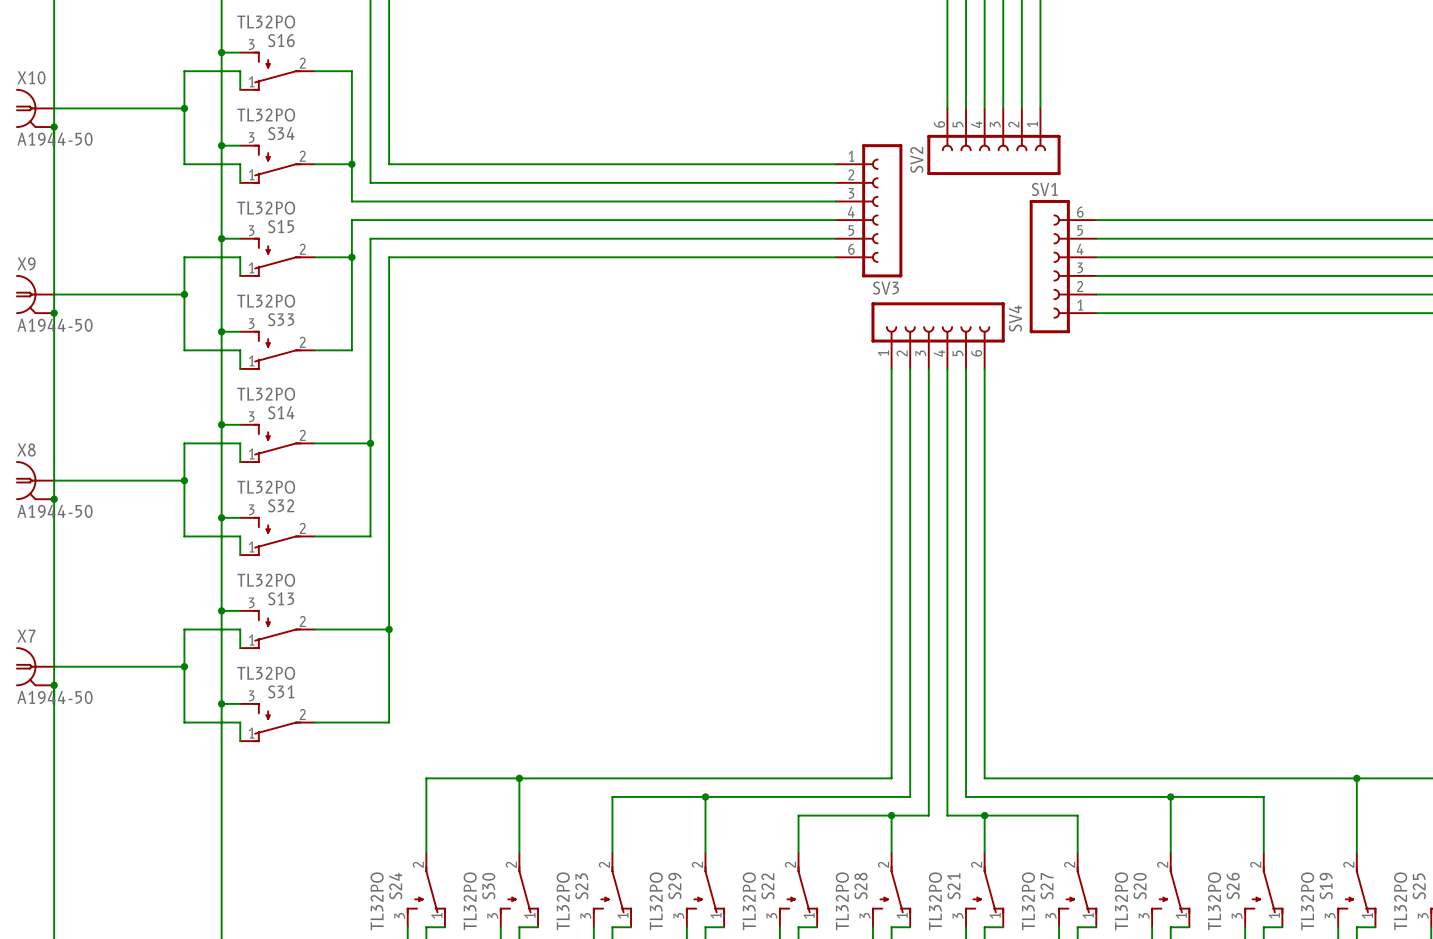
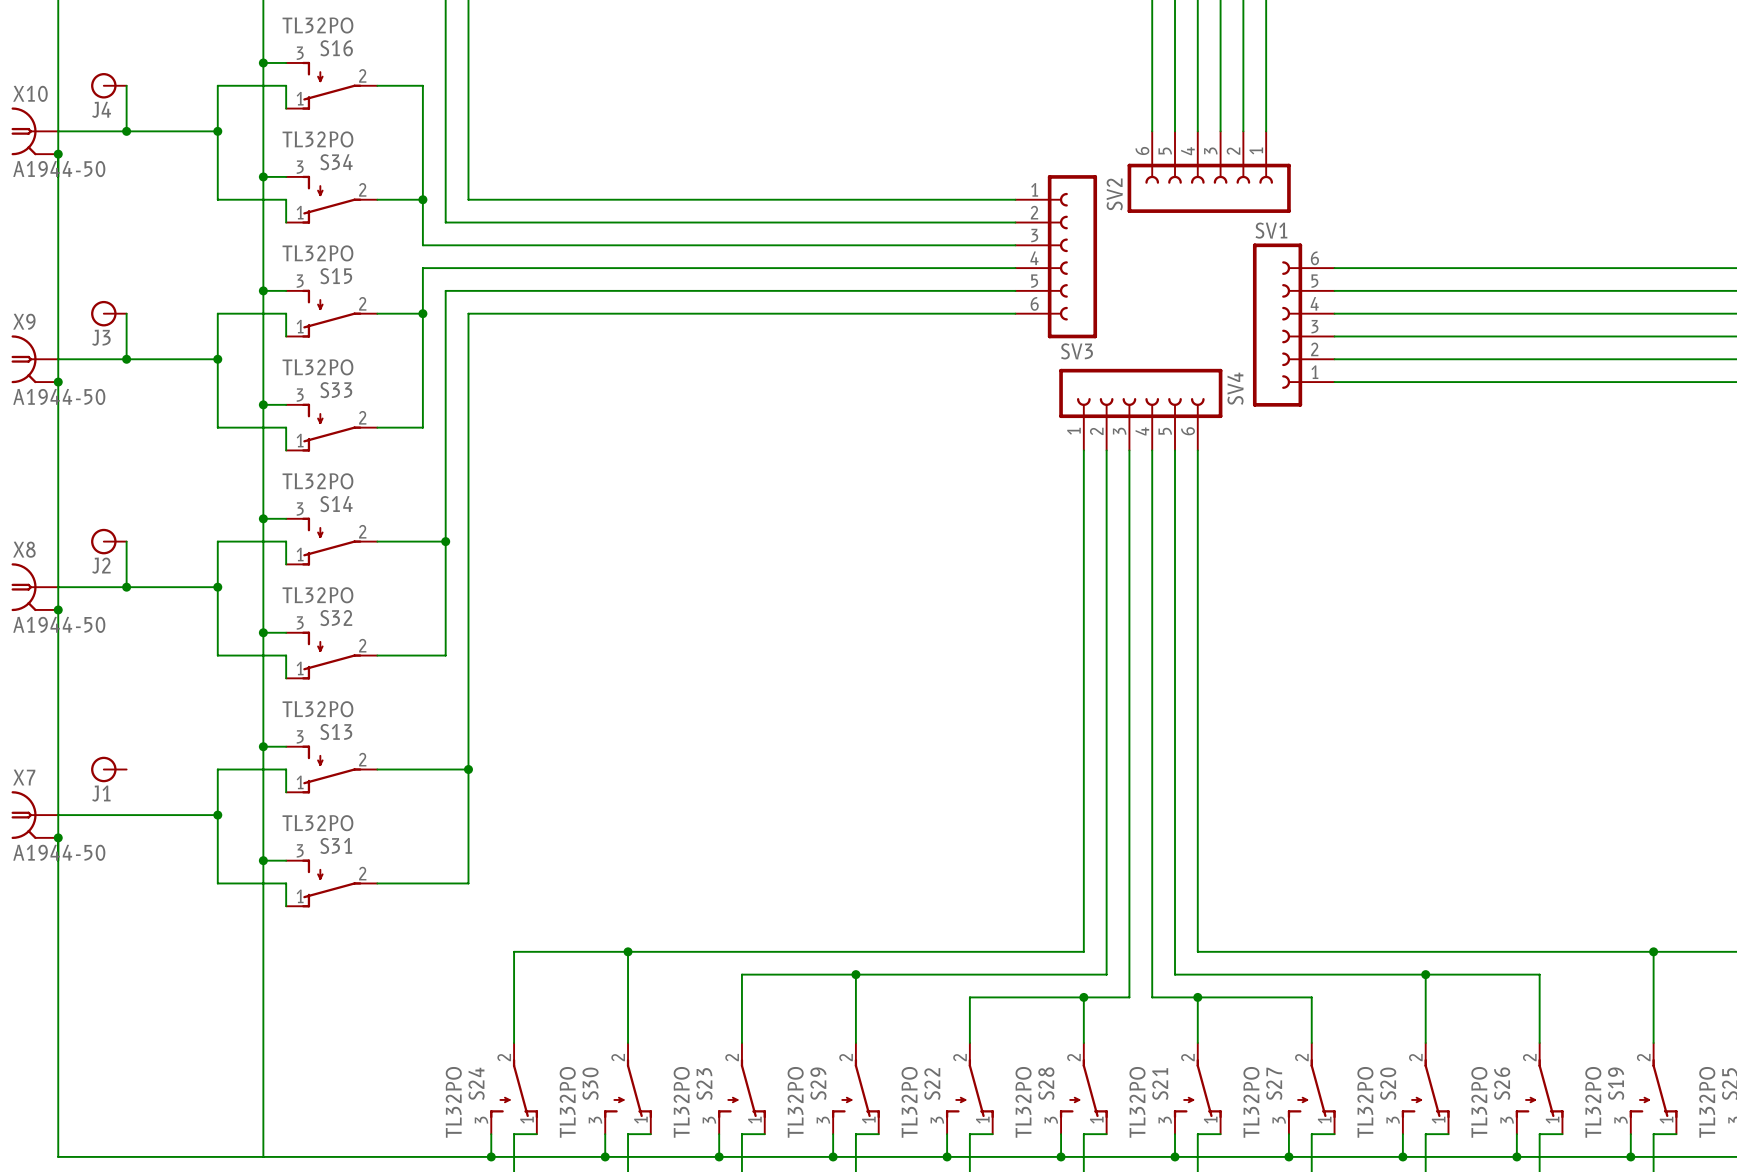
J4: none -> (108, 85)
wire: none -> (126, 85) (126, 131)
junction: none -> (126, 131)
J3: none -> (108, 313)
wire: none -> (126, 313) (126, 359)
junction: none -> (126, 359)
J2: none -> (108, 541)
wire: none -> (126, 541) (126, 587)
junction: none -> (126, 587)
J1: none -> (108, 769)

